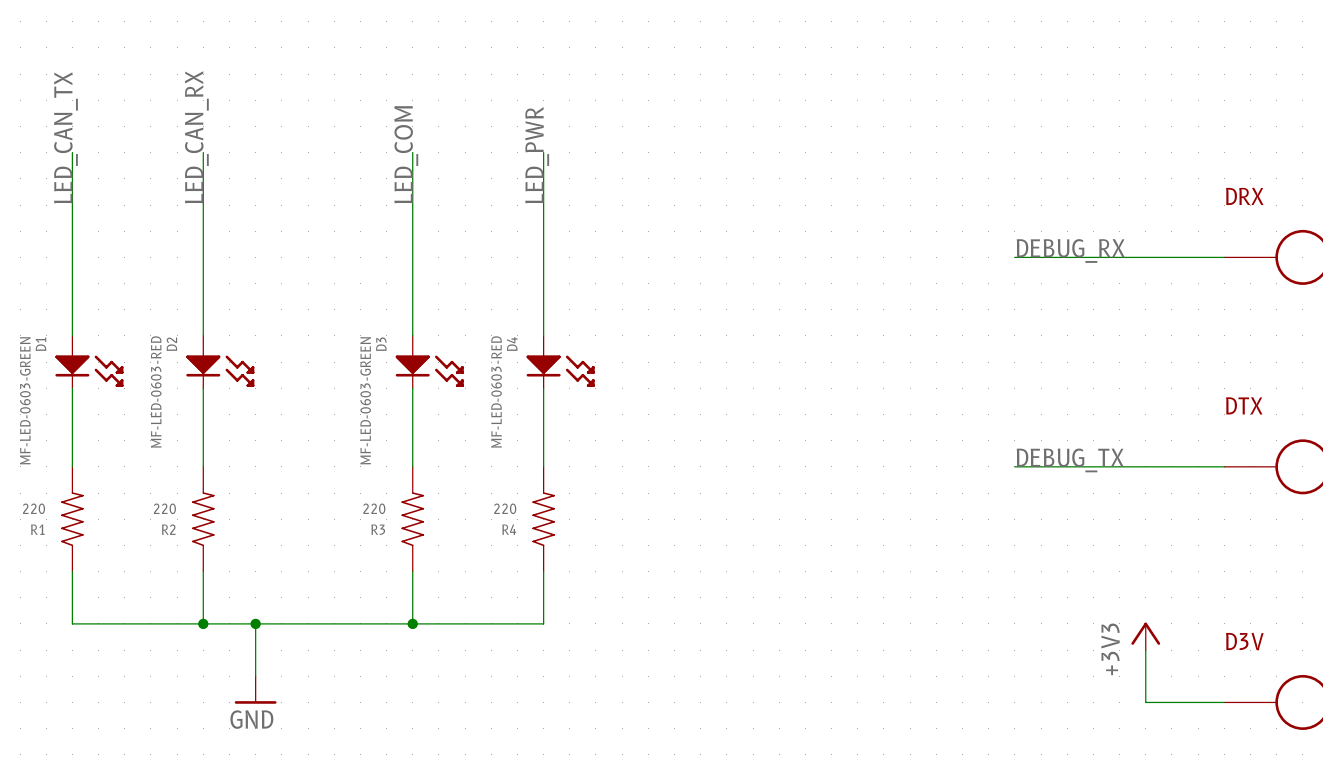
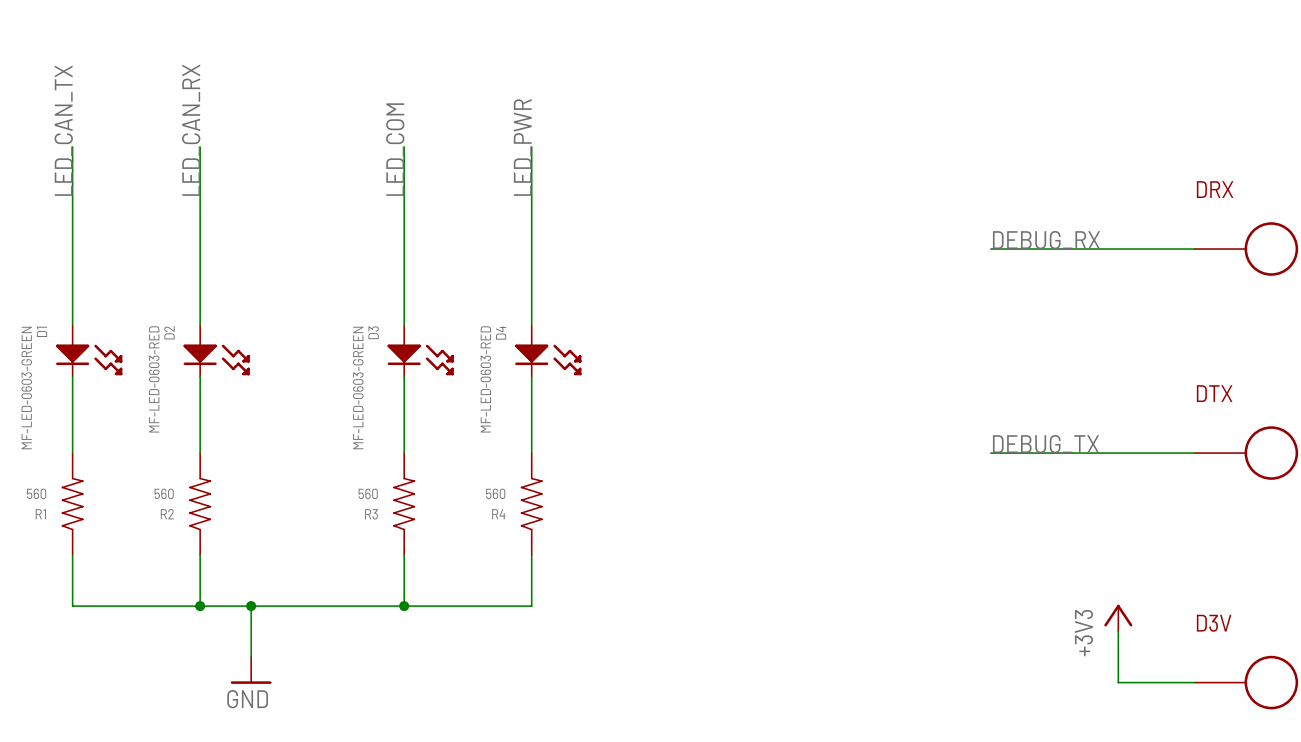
R1 value: 220 (34, 508) -> 560 (36, 493)
R2 value: 220 (164, 508) -> 560 (164, 493)
R3 value: 220 (374, 508) -> 560 (368, 493)
R4 value: 220 (505, 508) -> 560 (495, 493)

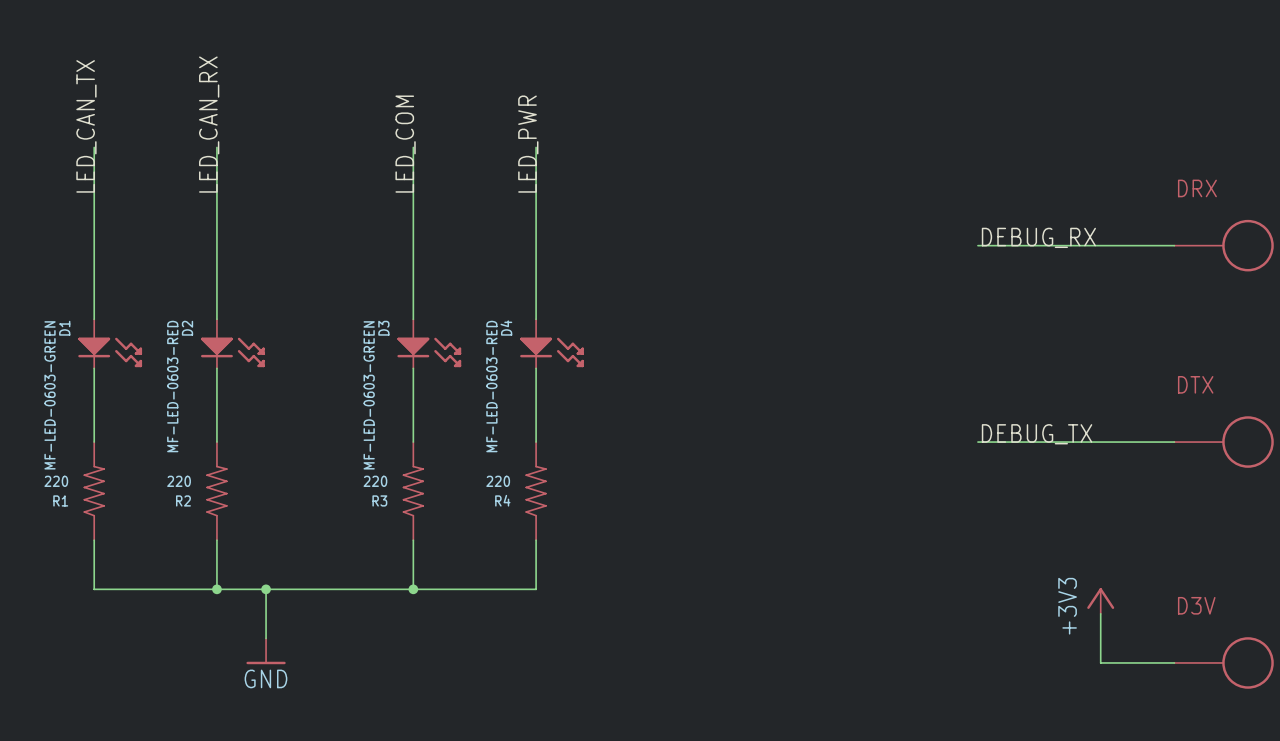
R1 value: 560 (36, 493) -> 220 (56, 481)
R2 value: 560 (164, 493) -> 220 (179, 481)
R3 value: 560 (368, 493) -> 220 (375, 481)
R4 value: 560 (495, 493) -> 220 (498, 481)

